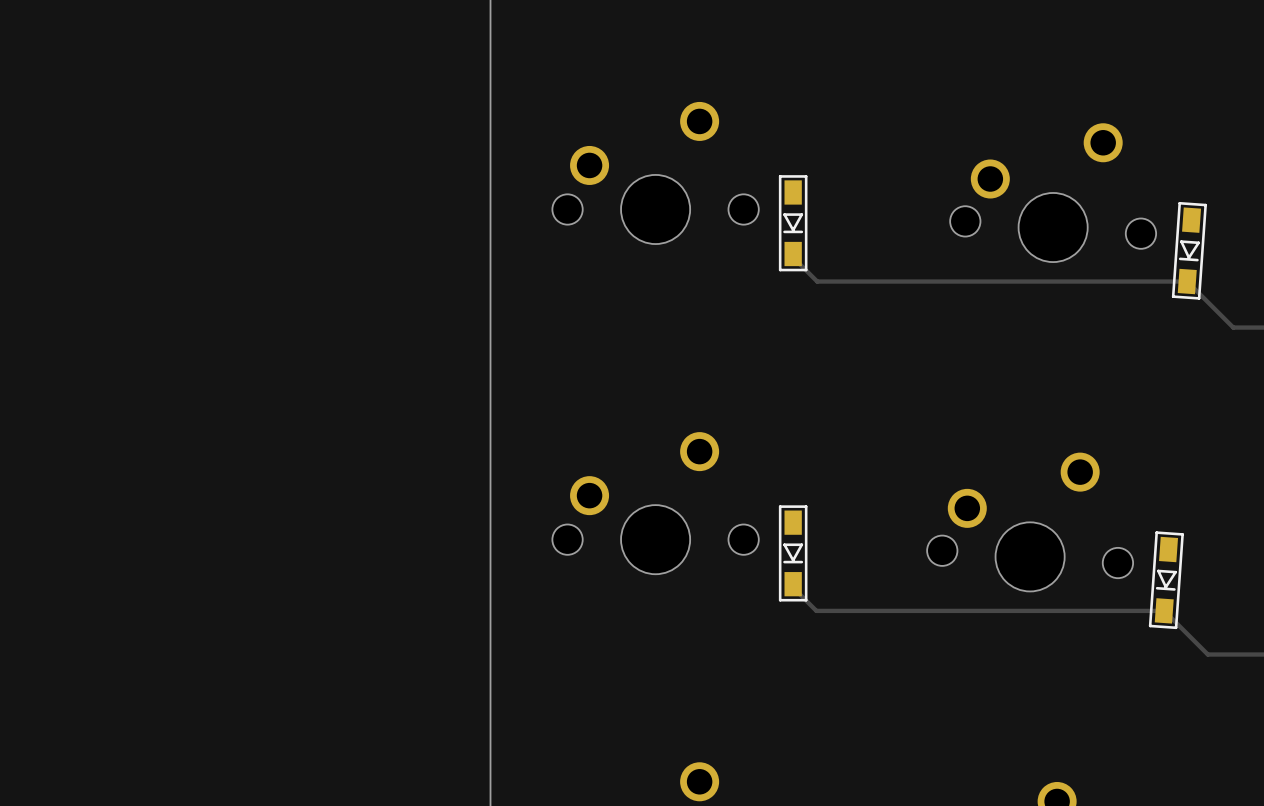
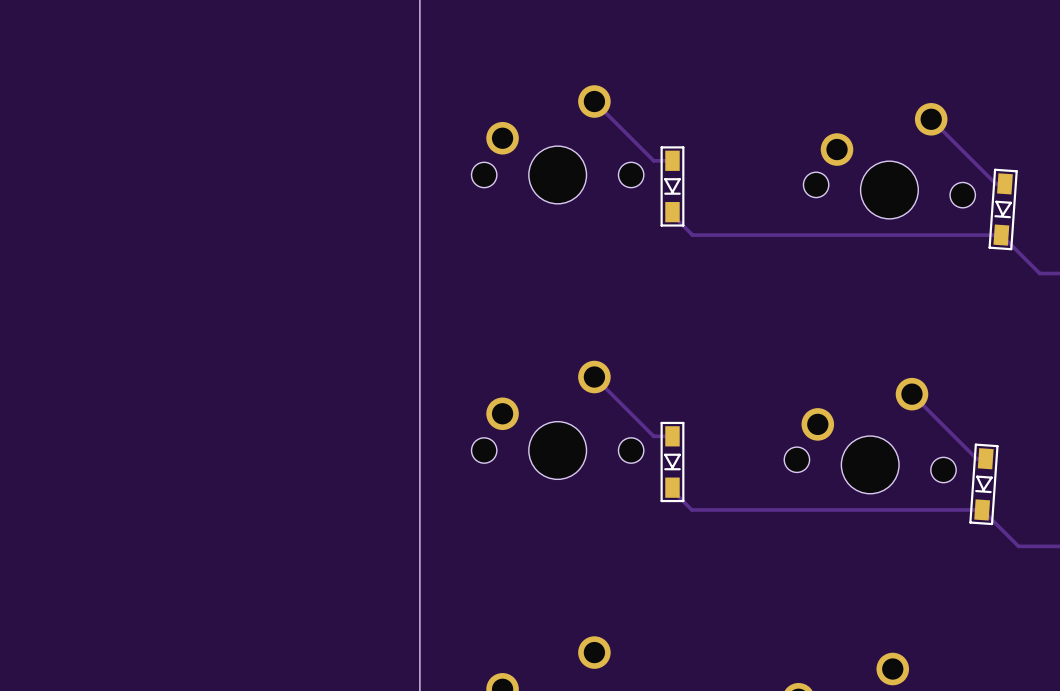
track: none -> (594, 101) (653, 160) (672, 160)
track: none -> (931, 119) (995, 183) (1004, 183)
track: none -> (594, 377) (653, 436) (672, 436)
track: none -> (911, 394) (976, 458) (985, 458)

